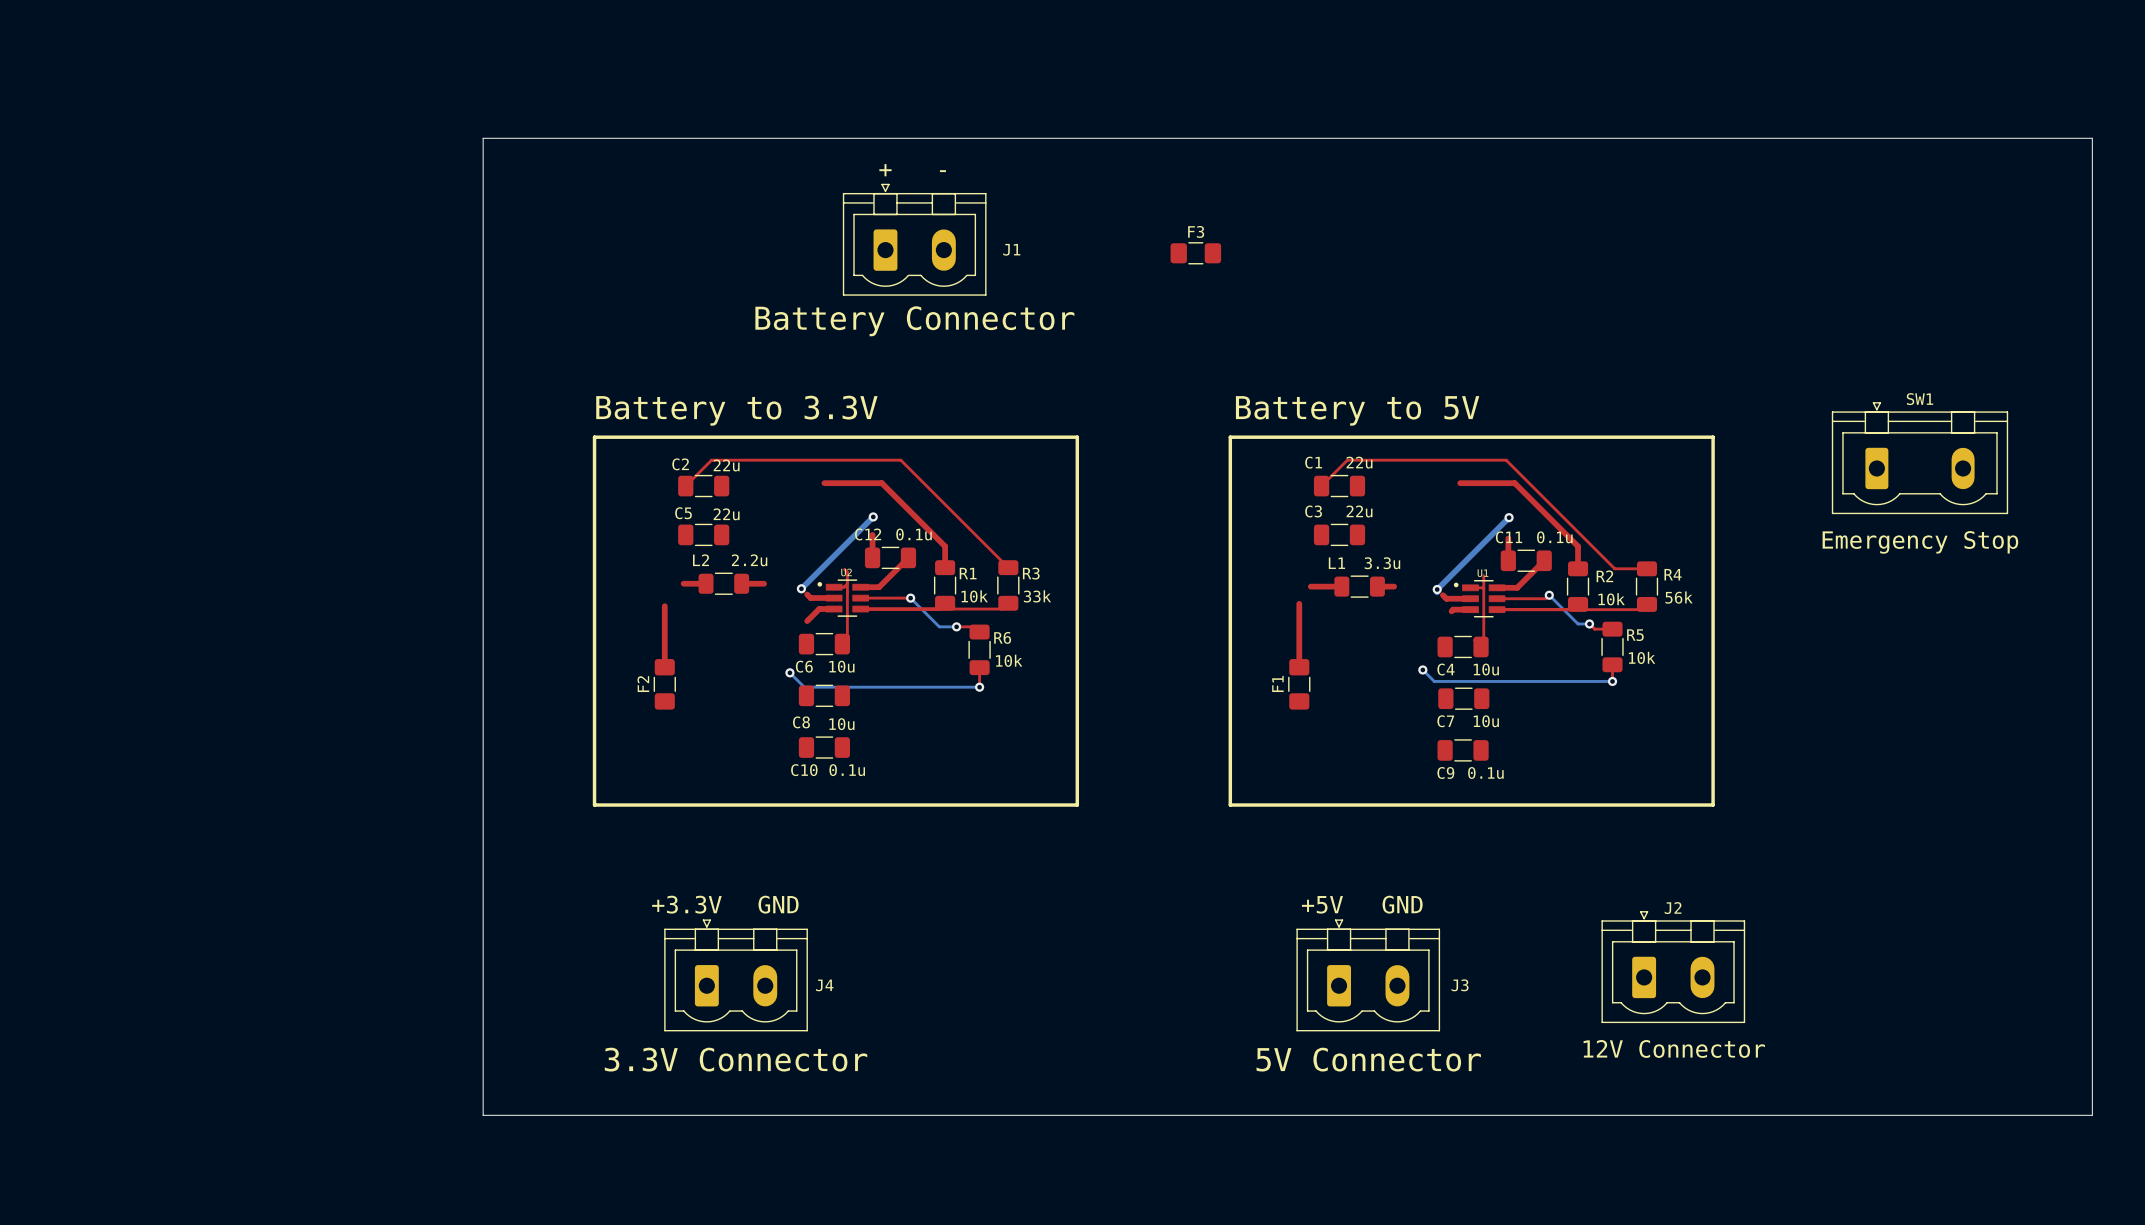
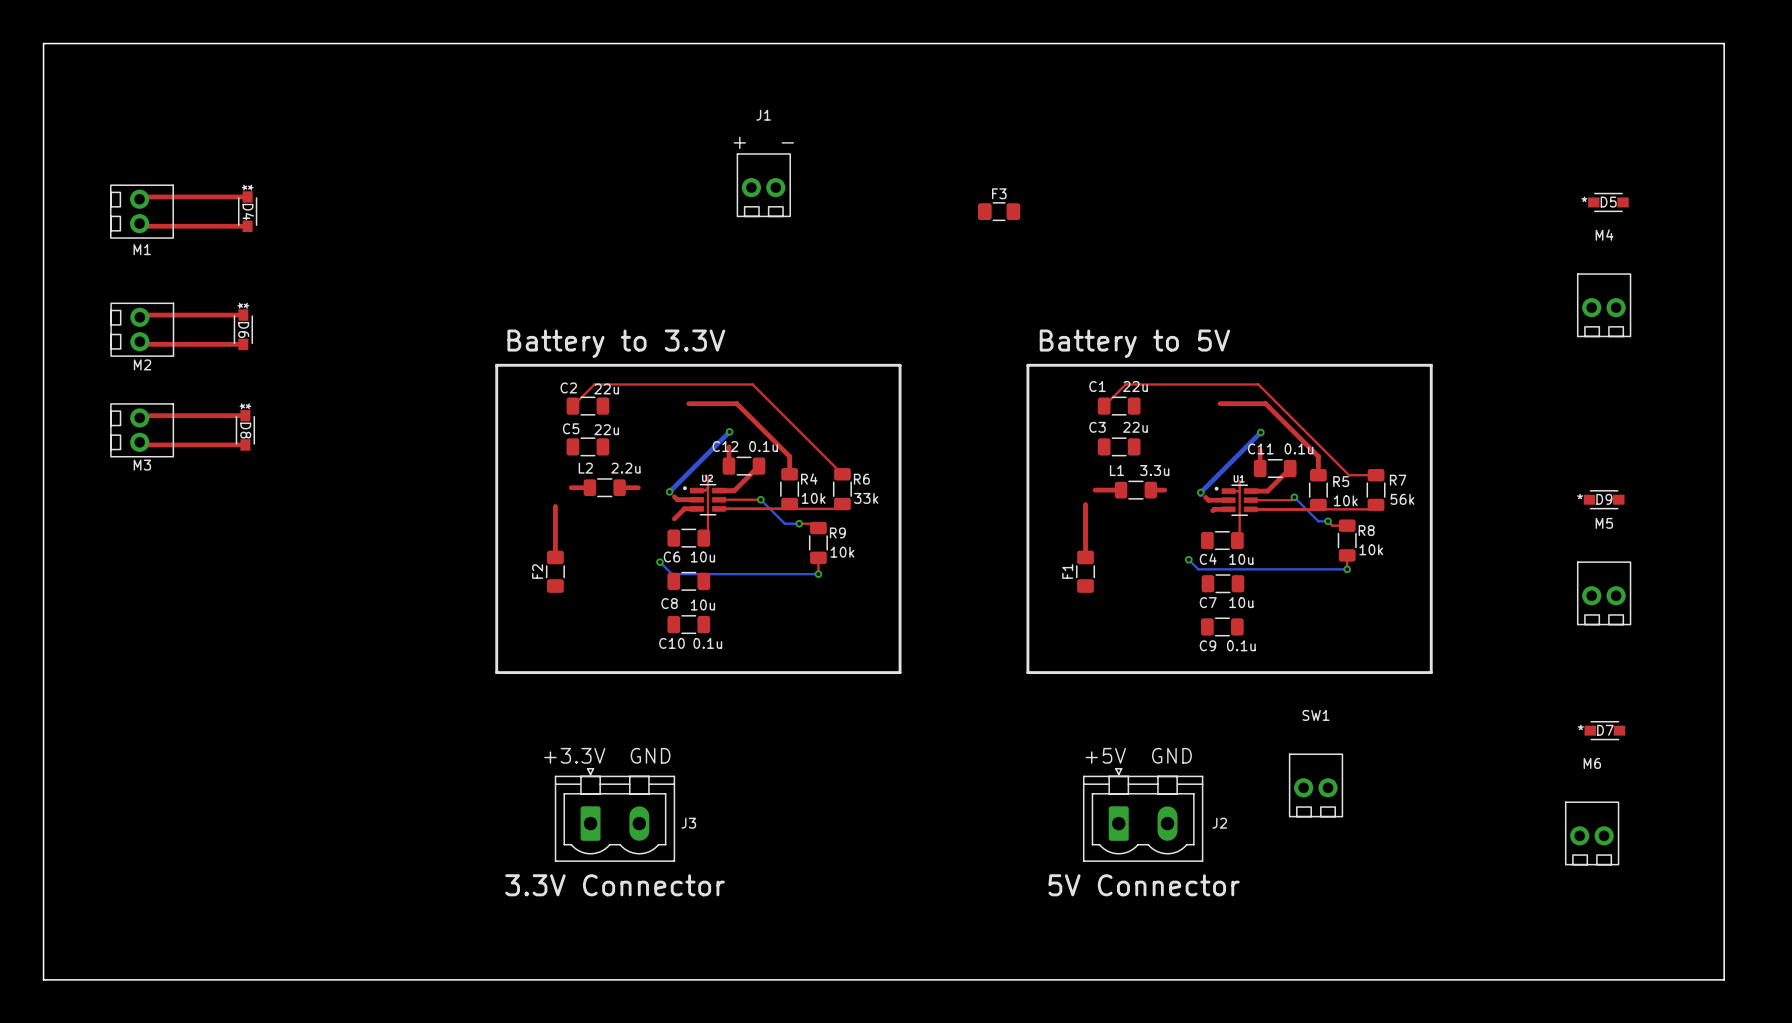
board edge: (483, 138) (483, 1115) (2092, 1115) (2092, 138) (483, 138) -> (43, 43) (43, 979) (1724, 979) (1724, 43) (43, 43)
J1 footprint: [842, 183, 987, 296] -> [736, 153, 791, 217]
top track: none -> (247, 196) (141, 196) (139, 199)
D5: none -> (1608, 202)
J1 name position: J1 (1011, 249) -> J1 (763, 115)
M1: none -> (141, 211)
D4: none -> (247, 211)
top track: none -> (139, 223) (142, 226) (247, 226)
J1 value: Battery Connector (914, 321) -> none
M4: none -> (1604, 305)
top track: none -> (243, 315) (142, 315) (139, 317)
M2: none -> (142, 329)
D6: none -> (243, 329)
SW1 name position: SW1 (1919, 399) -> SW1 (1316, 715)
SW1 footprint: [1831, 402, 2009, 515] -> [1289, 753, 1344, 818]
top track: none -> (139, 341) (142, 344) (243, 344)
top track: none -> (245, 415) (141, 415) (139, 417)
M3: none -> (142, 430)
D8: none -> (245, 430)
top track: none -> (139, 442) (142, 444) (245, 444)
SW1 value: Emergency Stop (1920, 542) -> none
R1 name: R1 (968, 573) -> R4 (809, 478)
R3 name: R3 (1031, 573) -> R6 (861, 479)
R4 name: R4 (1673, 574) -> R7 (1398, 480)
R2 name: R2 (1604, 576) -> R5 (1341, 481)
D9: none -> (1604, 499)
R5 name: R5 (1635, 635) -> R8 (1366, 530)
R6 name: R6 (1002, 637) -> R9 (837, 532)
M5: none -> (1604, 593)
D7: none -> (1604, 730)
J2: 12V Connector (1673, 967) -> none
J4 name: J4 (824, 985) -> J3 (688, 823)
J3 name: J3 (1460, 985) -> J2 (1219, 823)
M6: none -> (1592, 833)

